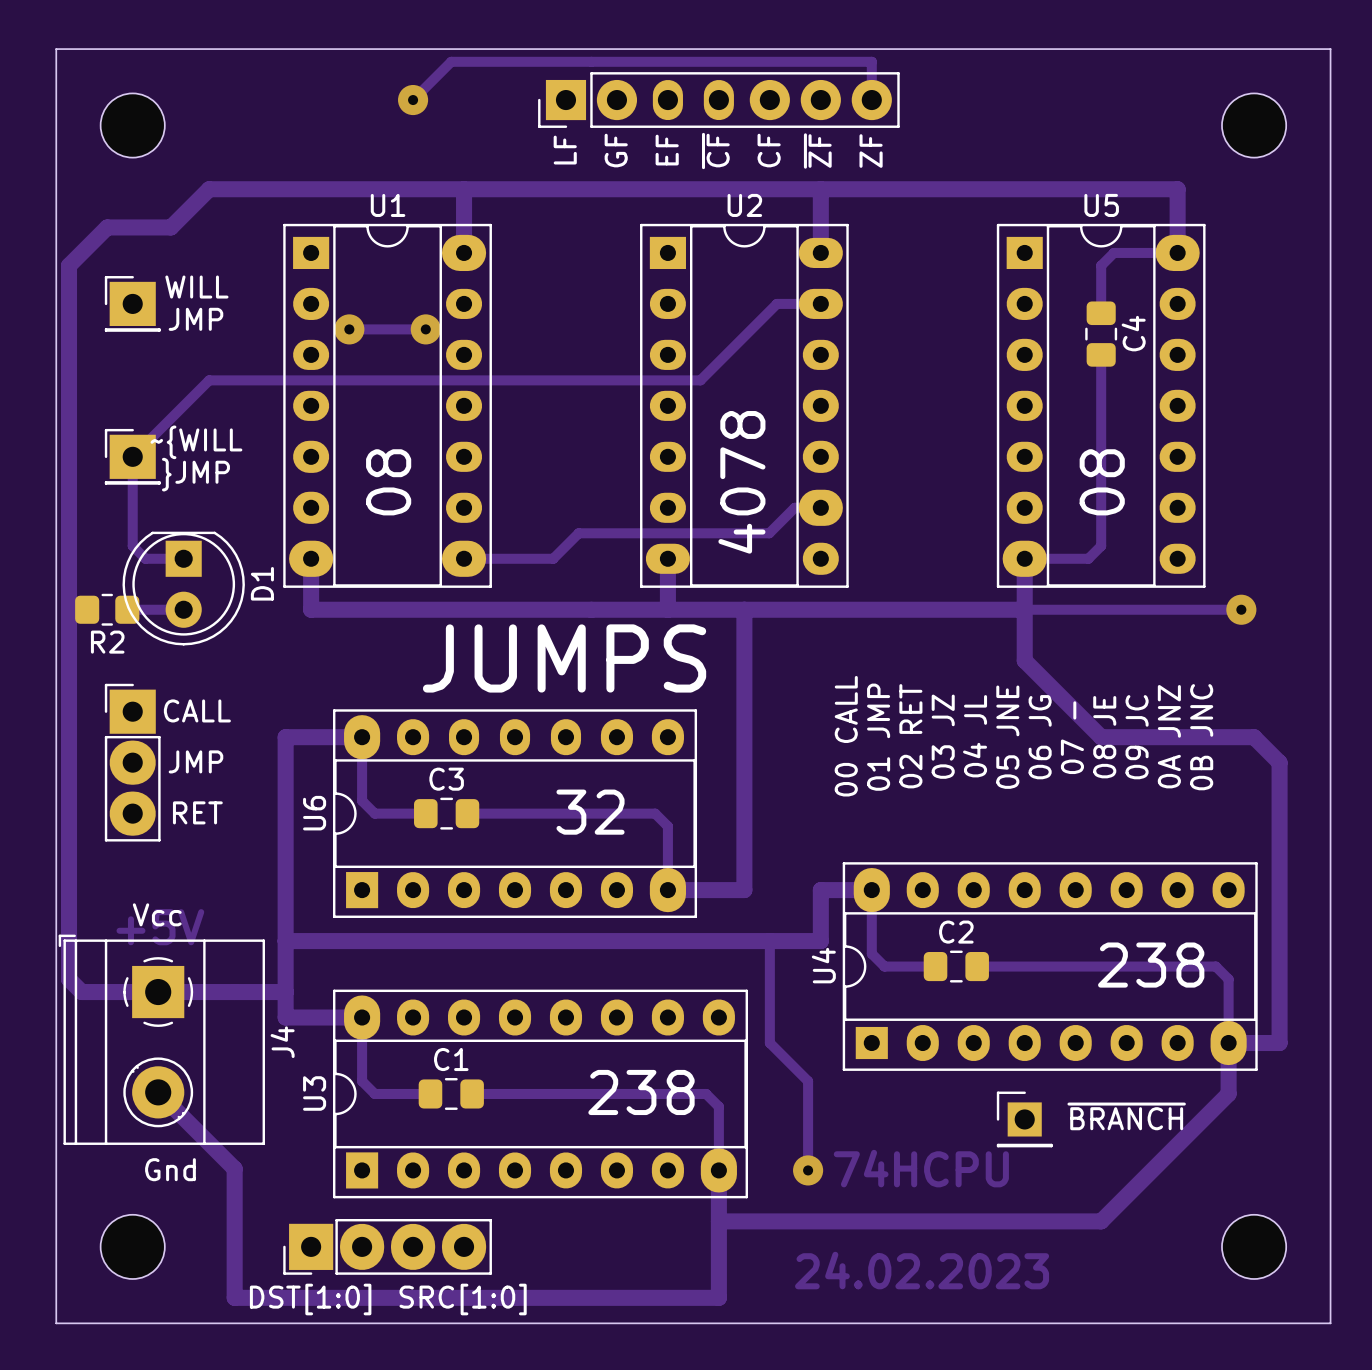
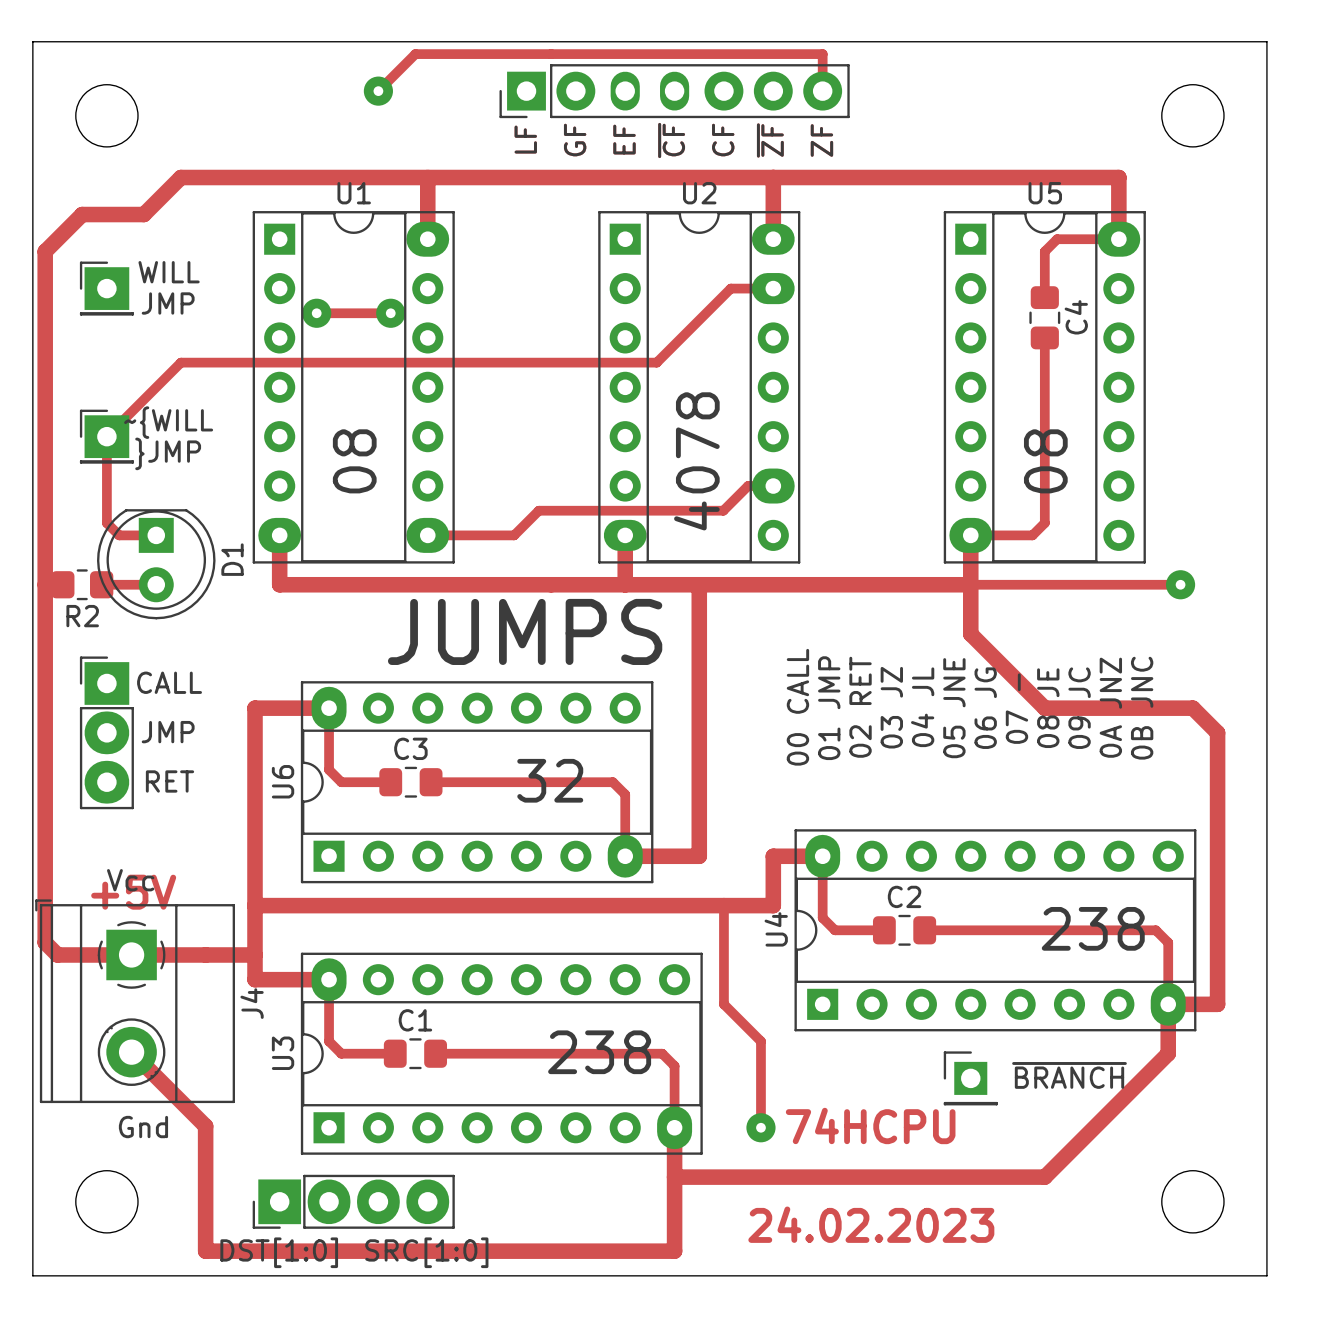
U1 footprint: [283, 223, 492, 588] -> [252, 211, 455, 564]
U2 footprint: [640, 223, 849, 588] -> [598, 211, 801, 564]
U5 footprint: [996, 223, 1206, 588] -> [943, 211, 1146, 564]
U6 footprint: [333, 709, 698, 918] -> [300, 681, 654, 884]
U4 footprint: [842, 862, 1258, 1071] -> [794, 829, 1197, 1032]
U3 footprint: [333, 989, 748, 1199] -> [300, 952, 703, 1155]

